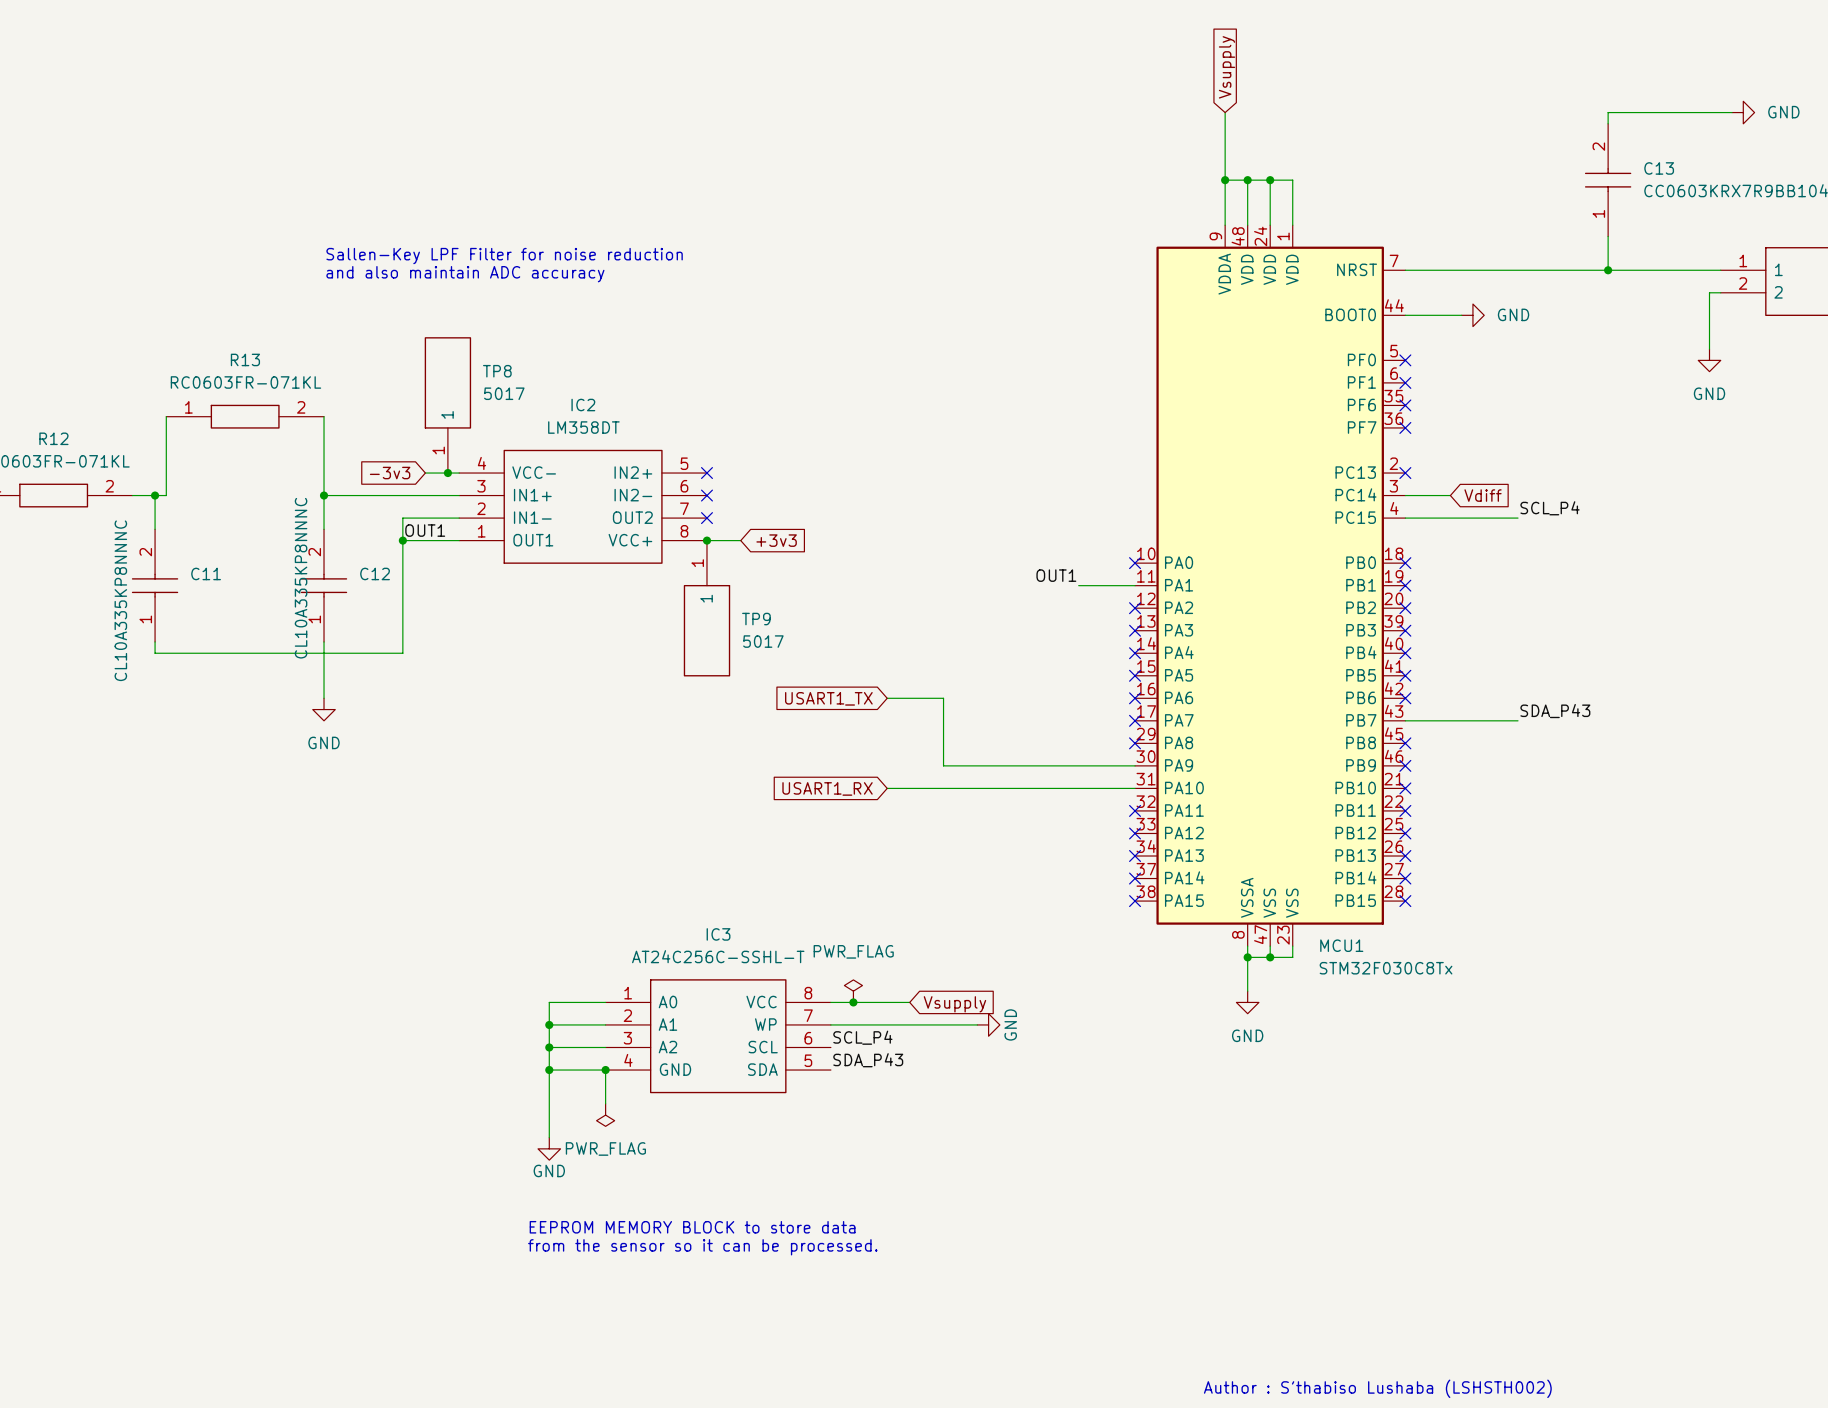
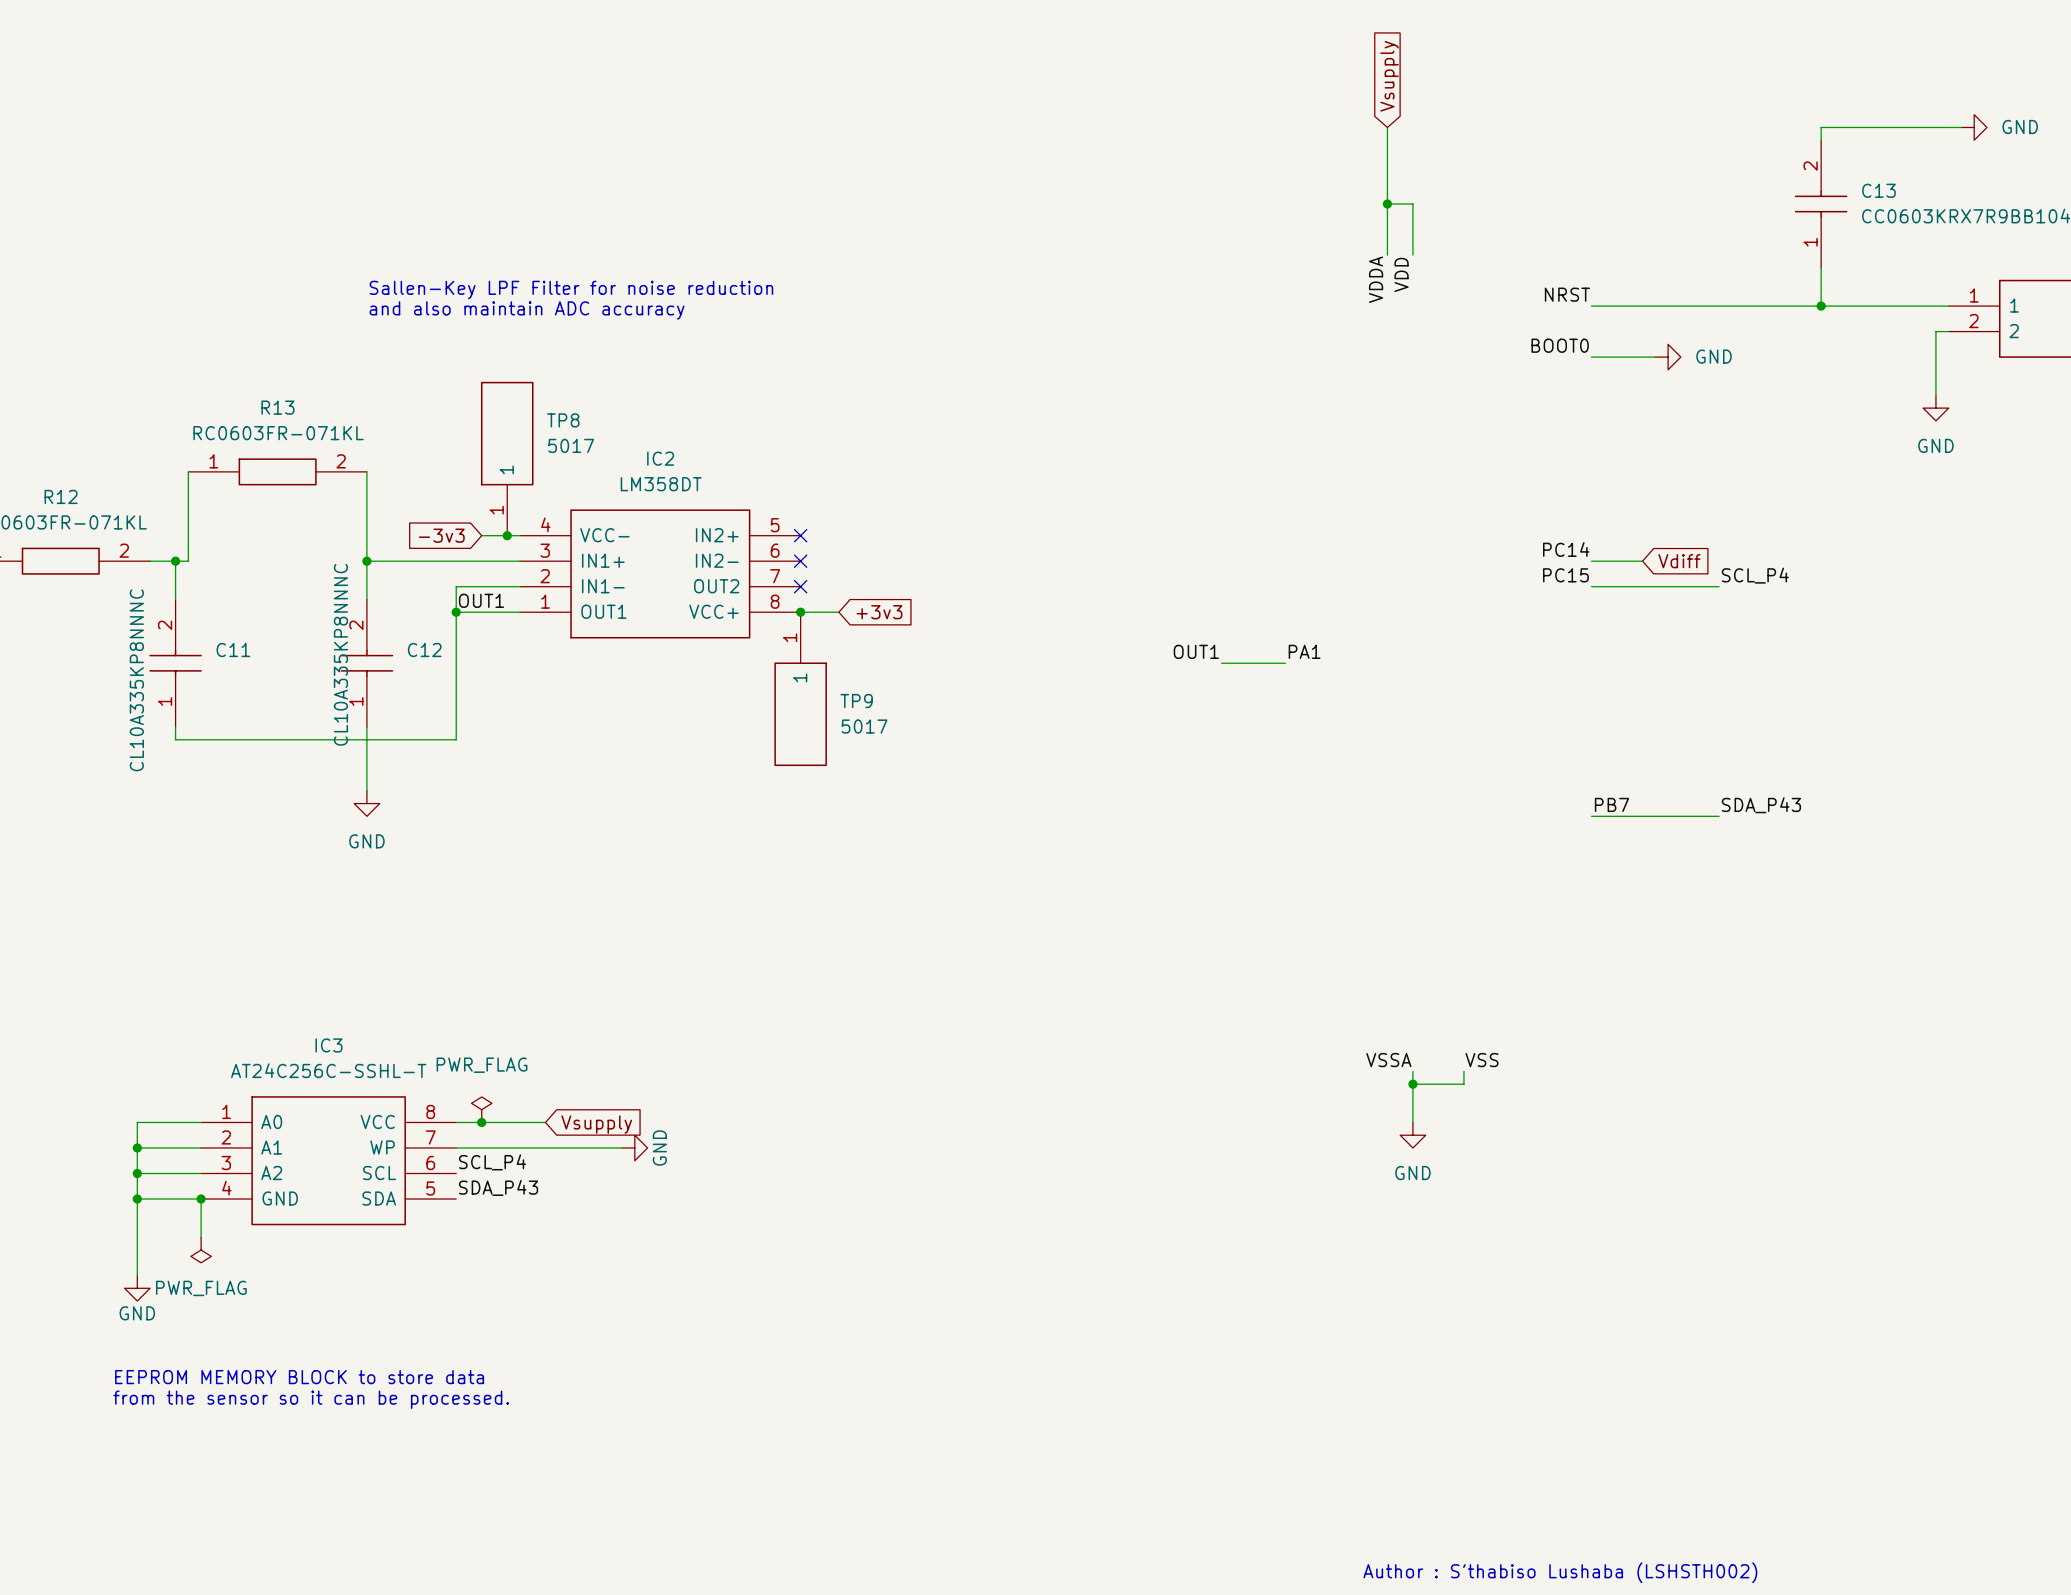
wire: (1247, 180) (1292, 180) (1292, 225) -> none
junction: (1247, 180) -> none
wire: (1270, 180) (1270, 225) -> none
junction: (1270, 180) -> none
label: none -> VDD (1401, 274)
label: none -> VDDA (1376, 279)
label: none -> NRST (1567, 294)
label: none -> BOOT0 (1560, 345)
no-connect mark: (1405, 360) -> none
no-connect mark: (1405, 382) -> none
no-connect mark: (1405, 405) -> none
no-connect mark: (1405, 427) -> none
no-connect mark: (1405, 473) -> none
label: none -> PC14 (1566, 549)
label: none -> PC15 (1565, 575)
no-connect mark: (1135, 563) -> none
no-connect mark: (1405, 563) -> none
label: none -> PA1 (1304, 651)
MCU1: STM32F030C8Tx (1270, 585) -> none
no-connect mark: (1405, 585) -> none
no-connect mark: (1135, 608) -> none
no-connect mark: (1405, 608) -> none
no-connect mark: (1135, 630) -> none
no-connect mark: (1405, 630) -> none
no-connect mark: (1135, 653) -> none
no-connect mark: (1405, 653) -> none
no-connect mark: (1135, 675) -> none
no-connect mark: (1405, 675) -> none
global label: USART1_TX (828, 698) -> none
wire: (887, 698) (943, 698) (943, 765) (1135, 765) -> none
no-connect mark: (1135, 698) -> none
no-connect mark: (1405, 698) -> none
label: none -> PB7 (1611, 804)
no-connect mark: (1135, 720) -> none
no-connect mark: (1135, 743) -> none
no-connect mark: (1405, 743) -> none
no-connect mark: (1405, 765) -> none
global label: USART1_RX (827, 788) -> none
wire: (887, 788) (1135, 788) -> none
no-connect mark: (1405, 788) -> none
no-connect mark: (1135, 810) -> none
no-connect mark: (1405, 810) -> none
no-connect mark: (1135, 833) -> none
no-connect mark: (1405, 833) -> none
no-connect mark: (1135, 856) -> none
no-connect mark: (1405, 856) -> none
no-connect mark: (1135, 878) -> none
no-connect mark: (1405, 878) -> none
no-connect mark: (1135, 901) -> none
no-connect mark: (1405, 901) -> none
label: none -> VSSA (1388, 1060)
label: none -> VSS (1481, 1060)
wire: (1270, 946) (1270, 957) -> none
junction: (1270, 957) -> none
power symbol: none -> PWR_FLAG (481, 1109)
wire: none -> (201, 1122) (137, 1122) (137, 1275)
wire: none -> (456, 1122) (545, 1122)
junction: none -> (481, 1122)
power symbol: PWR_FLAG (853, 991) -> none
global label: none -> Vsupply (596, 1124)
wire: (605, 1002) (549, 1002) (549, 1137) -> none
wire: (830, 1002) (909, 1002) -> none
junction: (853, 1002) -> none
global label: Vsupply (954, 1004) -> none
wire: none -> (137, 1147) (201, 1147)
junction: none -> (137, 1147)
wire: none -> (456, 1147) (622, 1147)
wire: (549, 1024) (605, 1024) -> none
junction: (549, 1024) -> none
wire: (830, 1024) (977, 1024) -> none
power symbol: GND (988, 1024) -> none
label: none -> SCL_P4 (492, 1162)
wire: none -> (137, 1173) (201, 1173)
junction: none -> (137, 1173)
IC3 position: (718, 1036) -> (328, 1160)
label: SCL_P4 (862, 1037) -> none
wire: (549, 1047) (605, 1047) -> none
junction: (549, 1047) -> none
label: none -> SDA_P43 (498, 1187)
wire: none -> (137, 1199) (201, 1199) (201, 1237)
junction: none -> (137, 1199)
junction: none -> (201, 1199)
label: SDA_P43 (868, 1060) -> none
wire: (549, 1070) (605, 1070) (605, 1103) -> none
junction: (549, 1070) -> none
junction: (605, 1070) -> none
power symbol: none -> PWR_FLAG (201, 1250)
power symbol: PWR_FLAG (605, 1115) -> none
power symbol: none -> GND (137, 1288)
power symbol rotation: 0° (549, 1148) -> 90° counterclockwise (634, 1147)
power symbol position: GND (549, 1148) -> GND (634, 1147)
text: none -> EEPROM MEMORY BLOCK to store data (299, 1377)
text: EEPROM MEMORY BLOCK to store data (692, 1227) -> none
text: none -> from the sensor so it can be processed. (311, 1399)
text: from the sensor so it can be processed. (702, 1247) -> none

